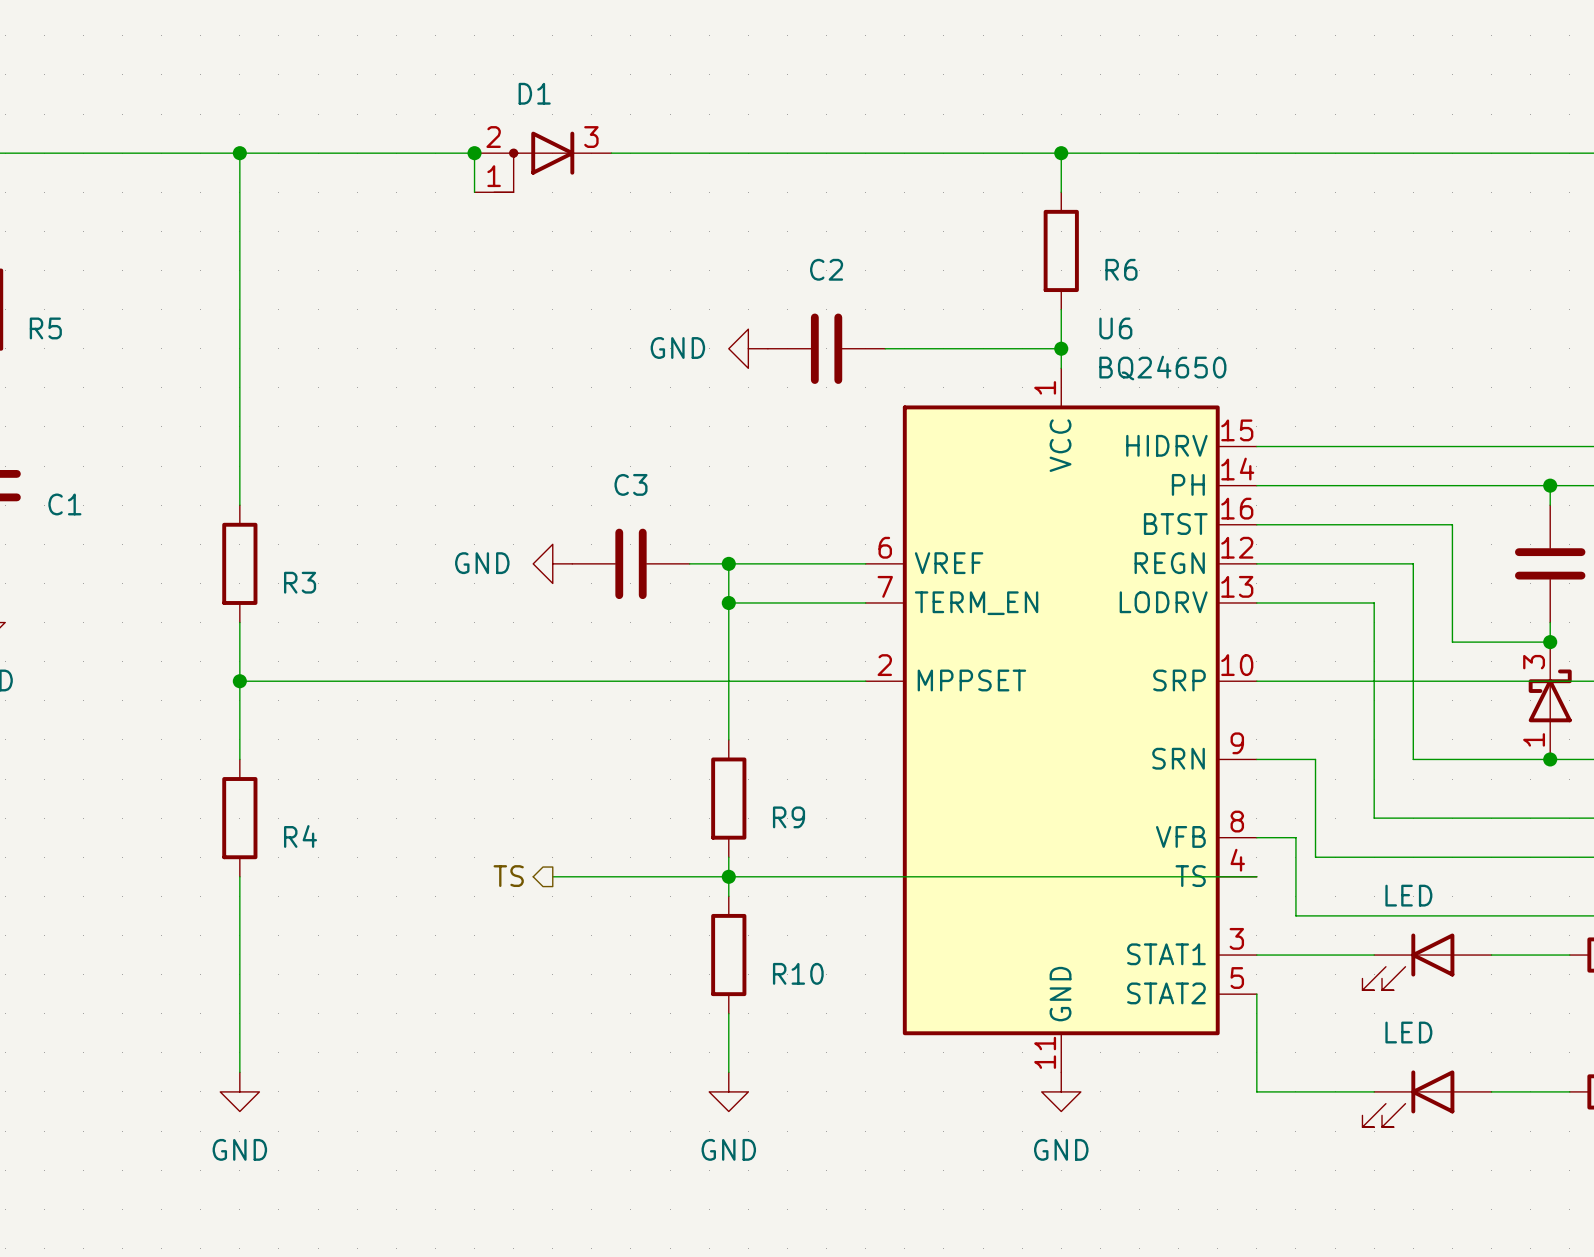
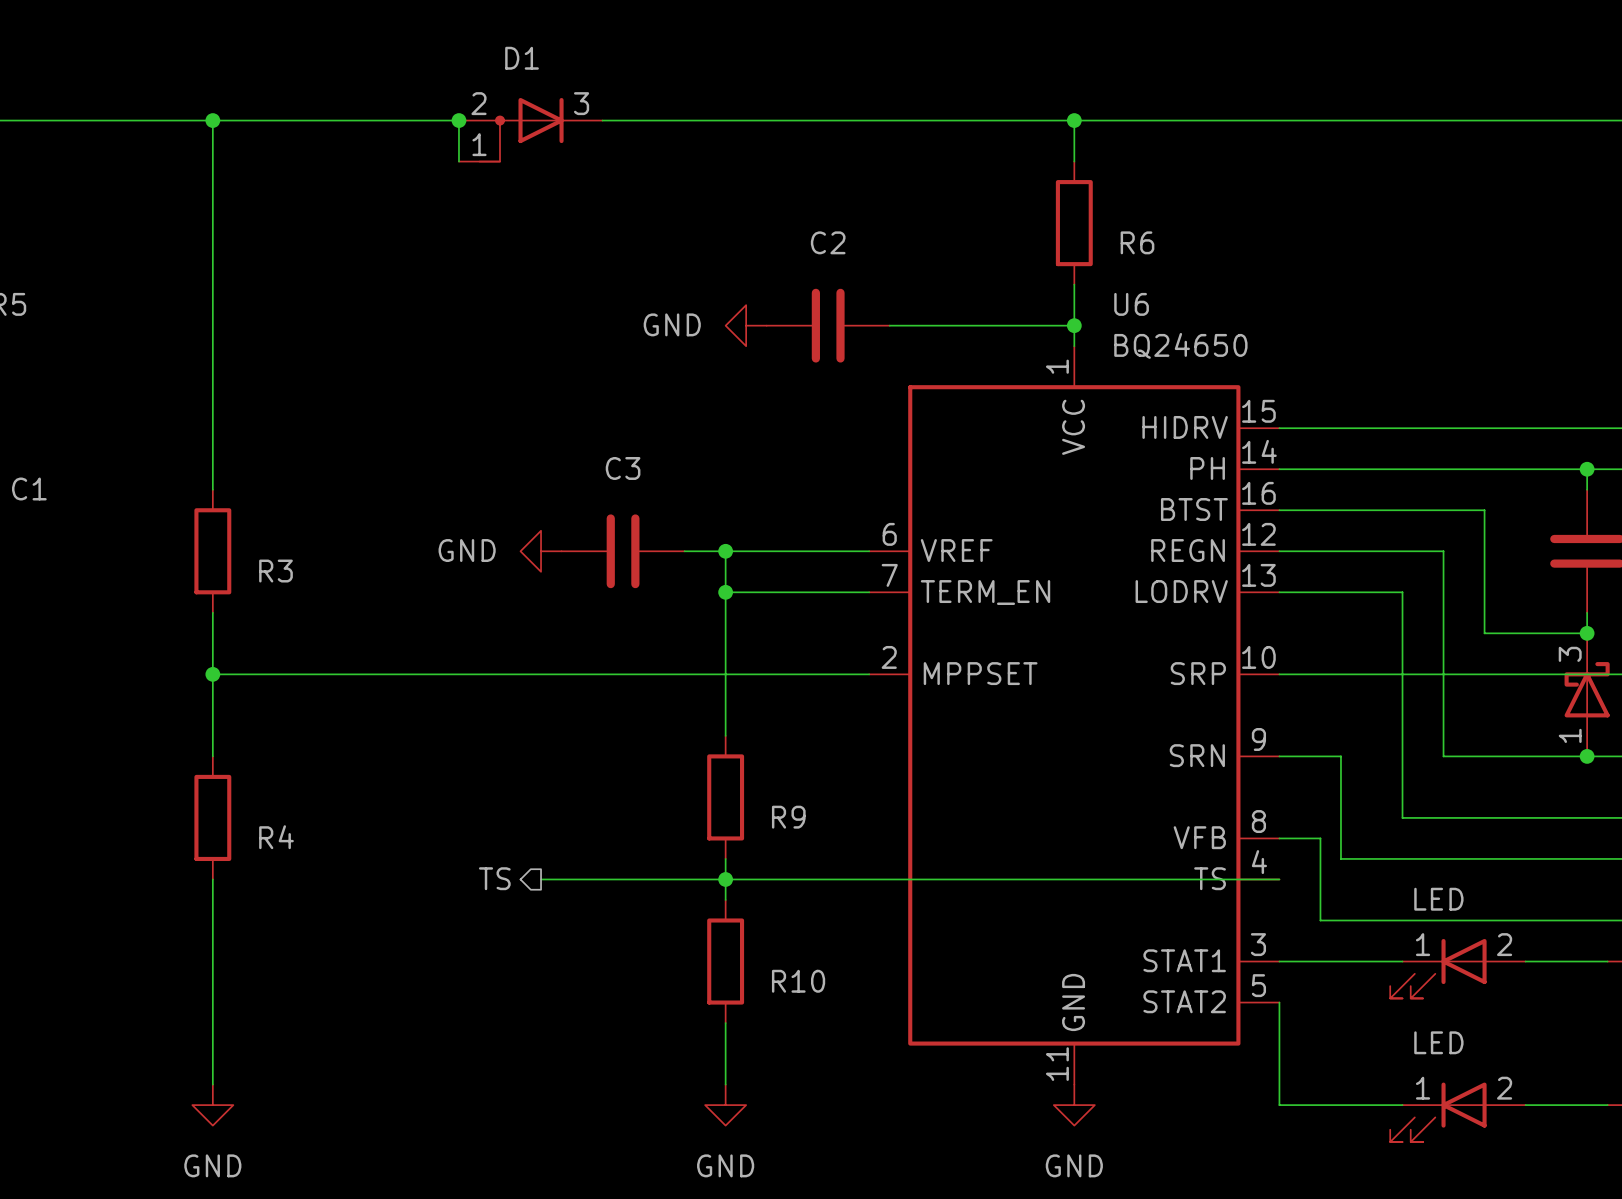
part pin number: none -> 1 (1423, 944)
part pin number: none -> 2 (1504, 944)
part pin number: none -> 1 (1423, 1088)
part pin number: none -> 2 (1504, 1088)

